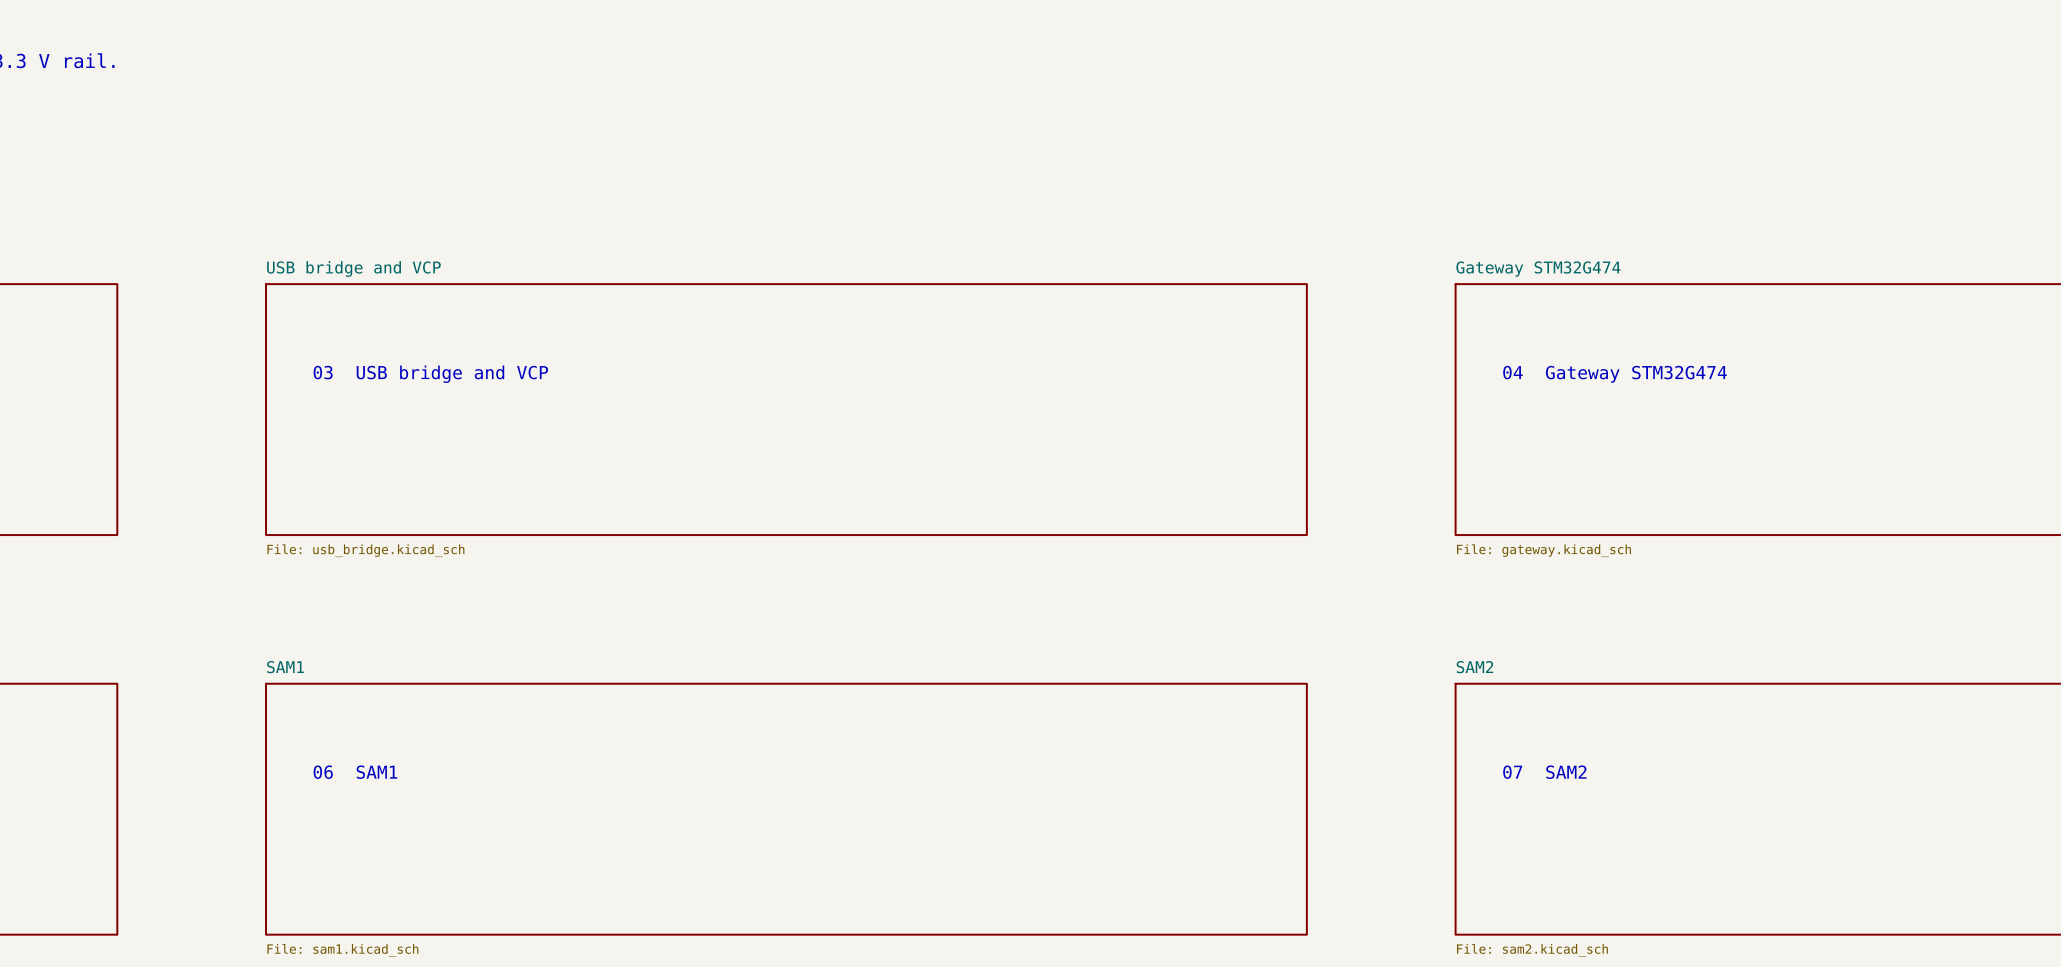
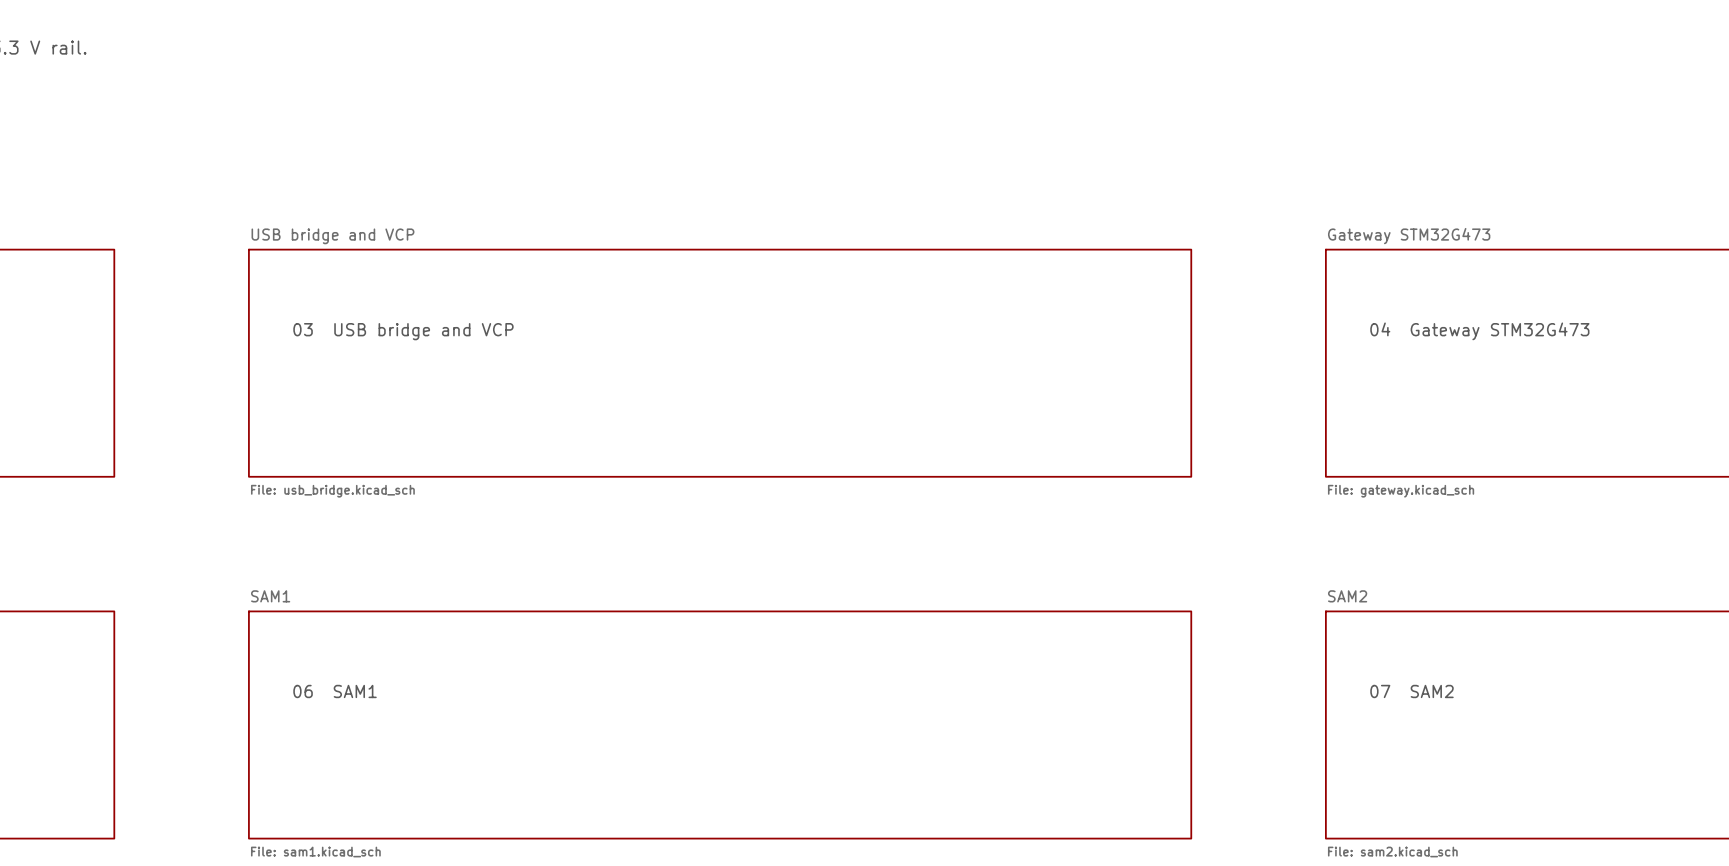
sheet Gateway STM32G474 name: Gateway STM32G474 (1538, 269) -> Gateway STM32G473 (1409, 236)
text: 04 Gateway STM32G474 (1615, 374) -> 04 Gateway STM32G473 (1479, 331)

